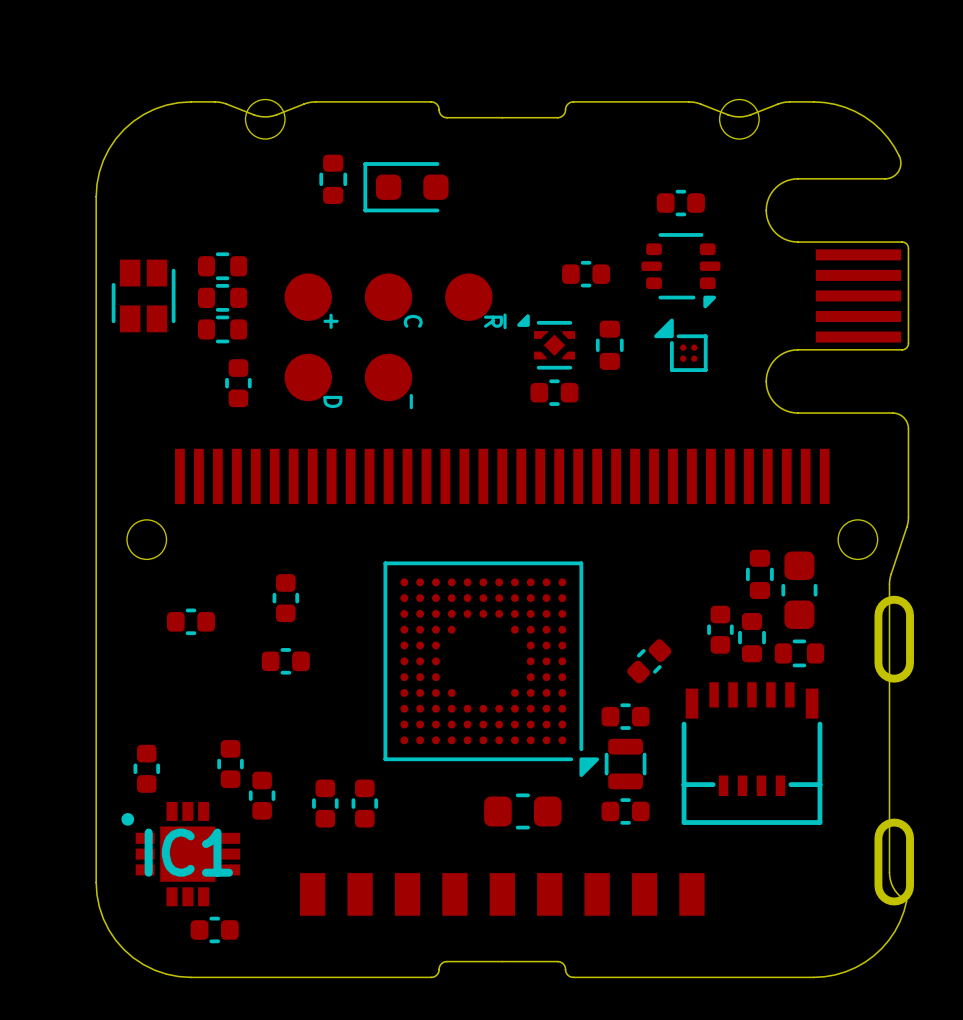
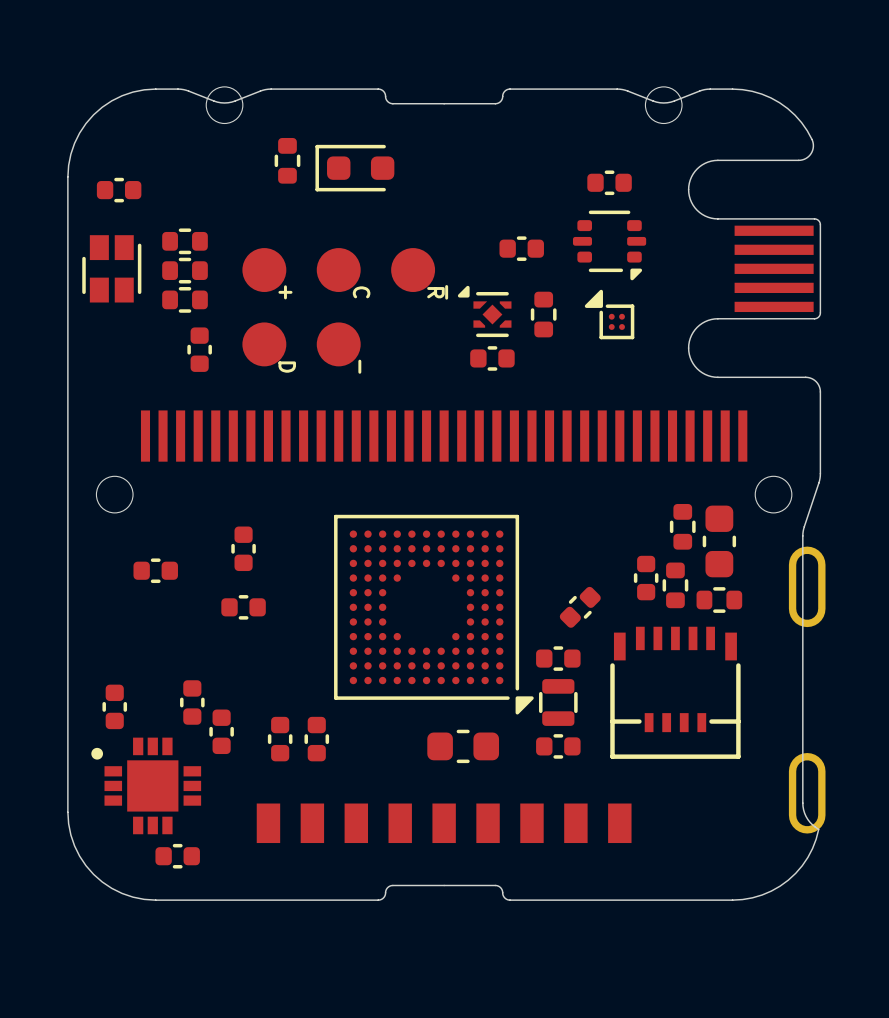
part: none -> (119, 190)
IC1 name: IC1 (188, 852) -> none

